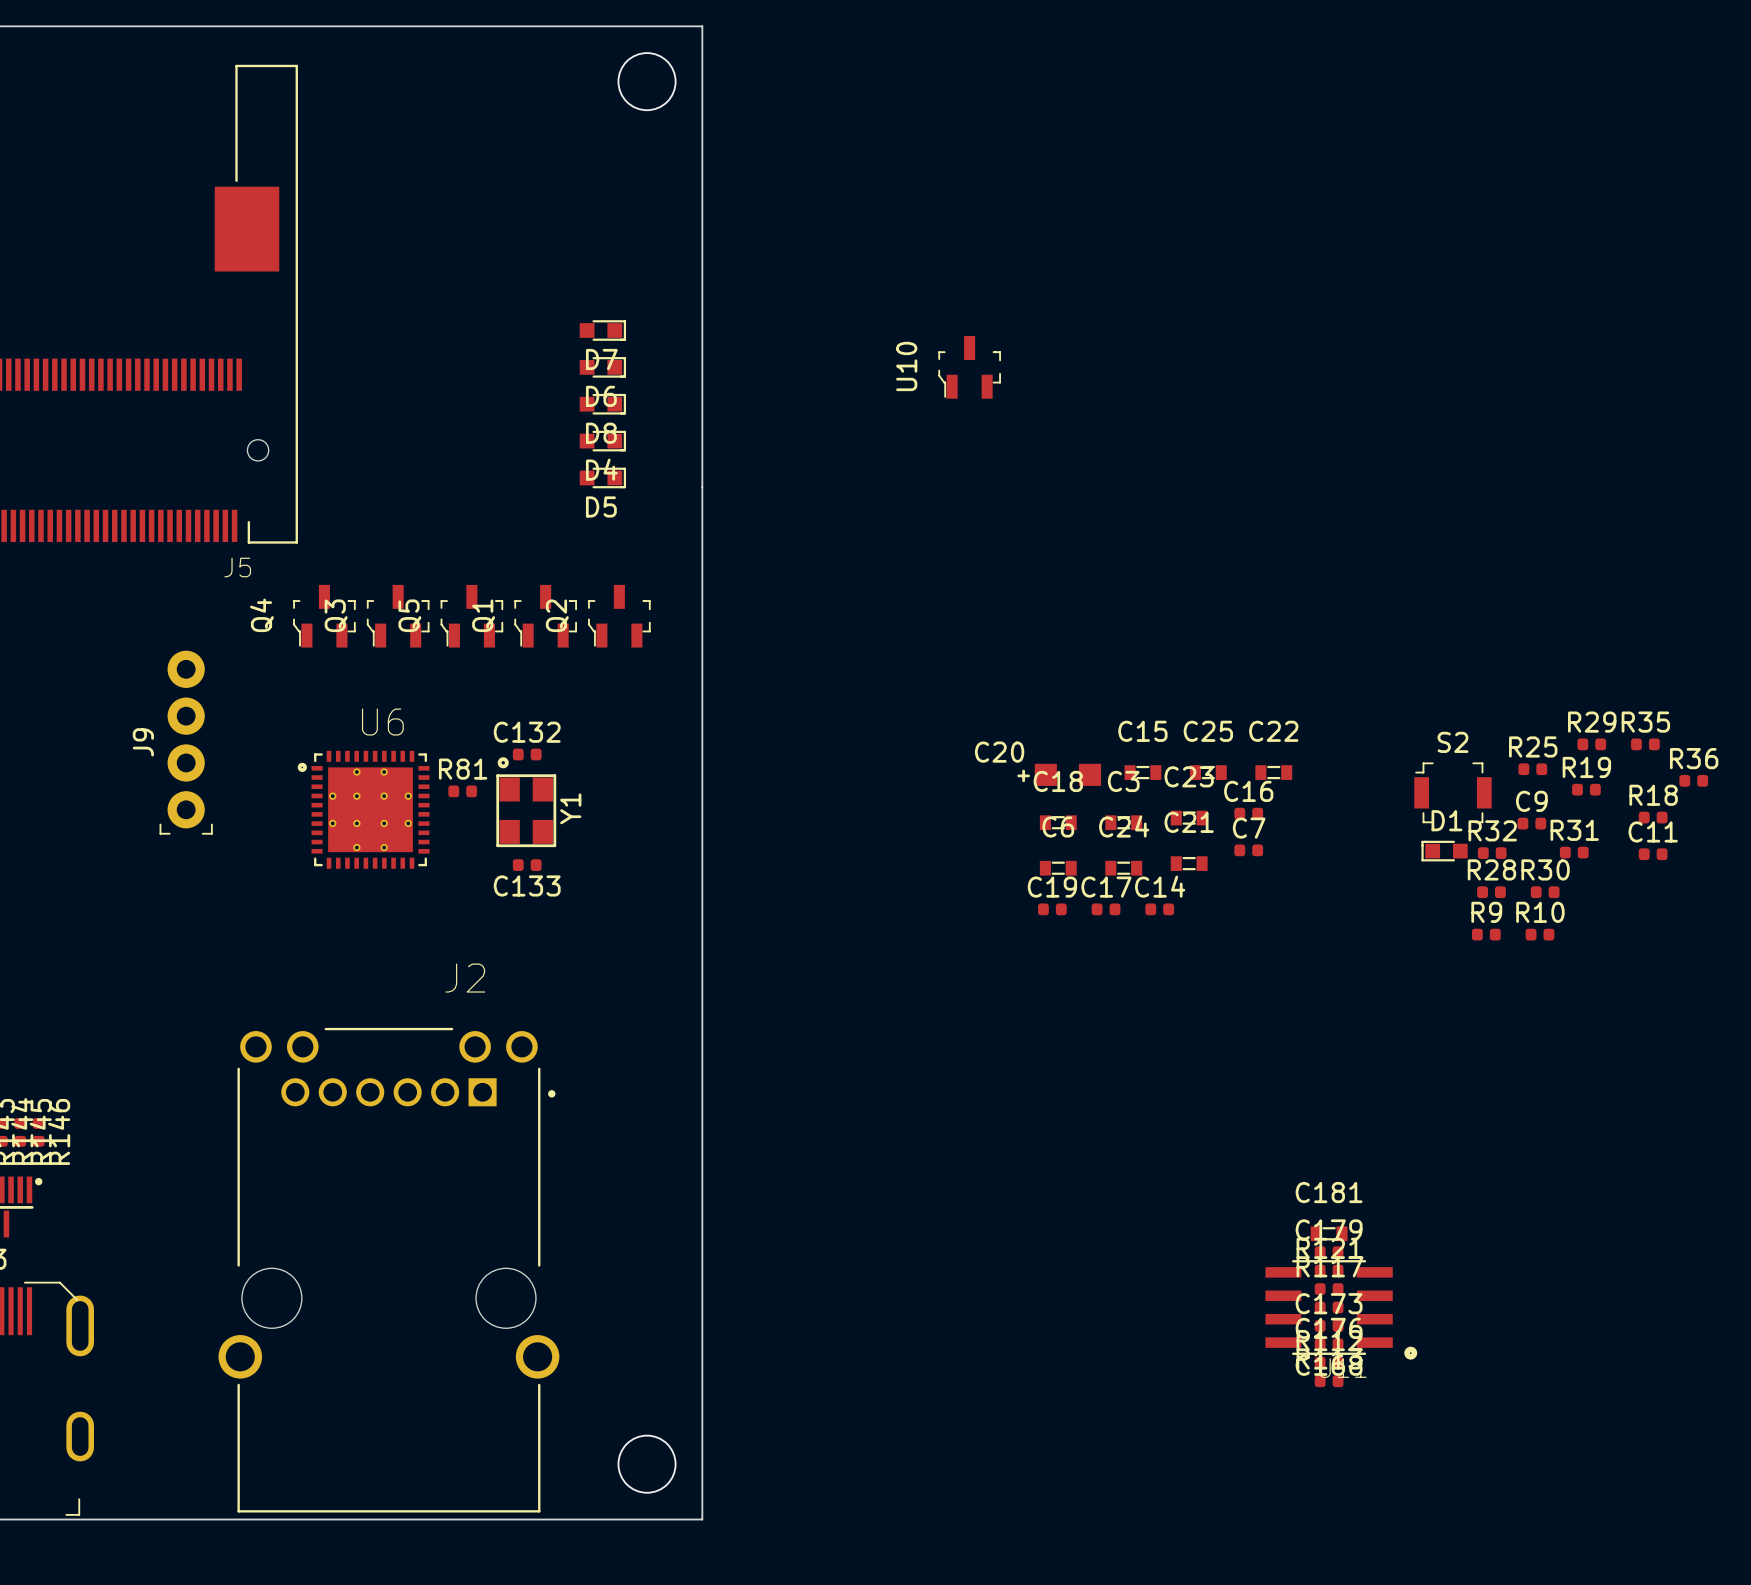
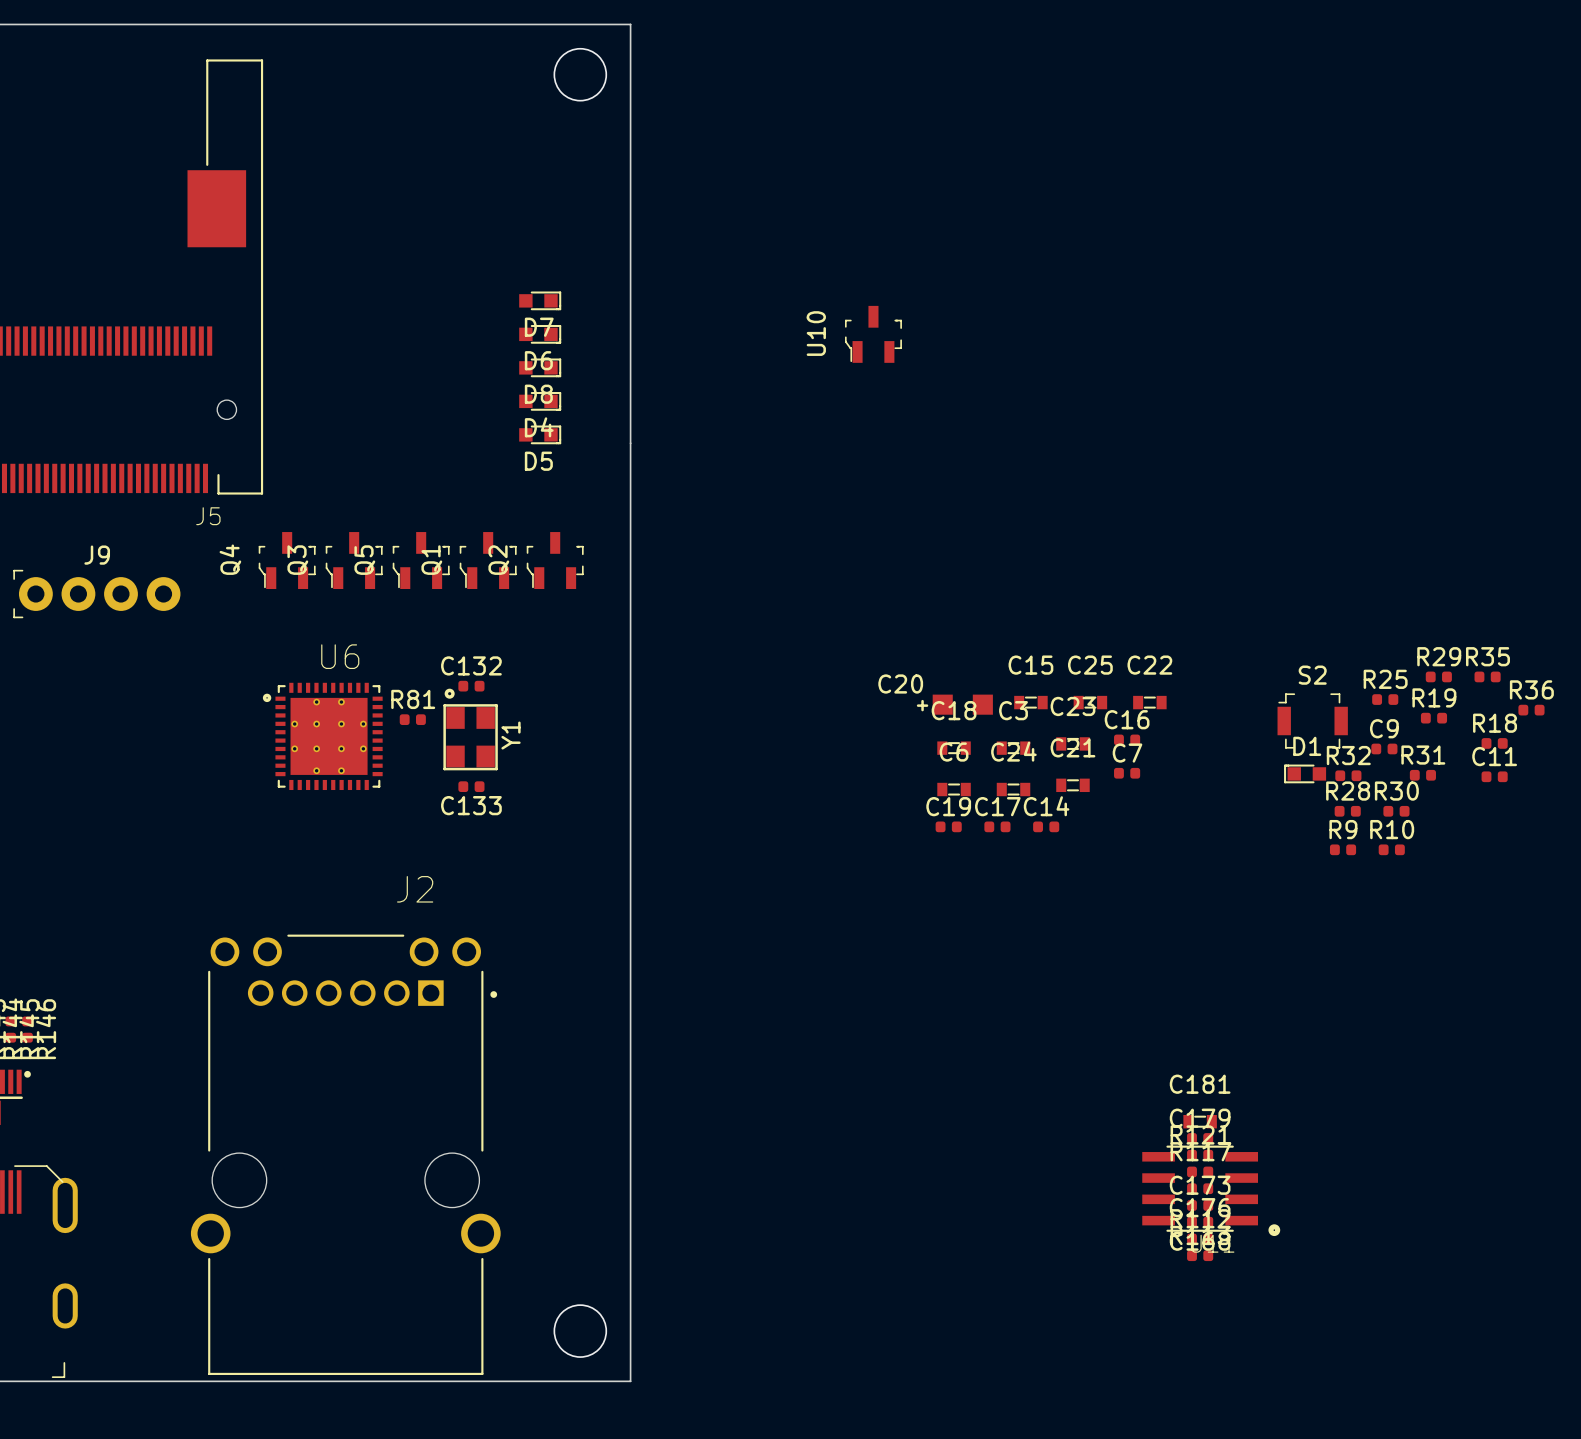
J9 rotation: 0° (186, 742) -> 90° clockwise (96, 594)
J9 position: (186, 742) -> (96, 594)

